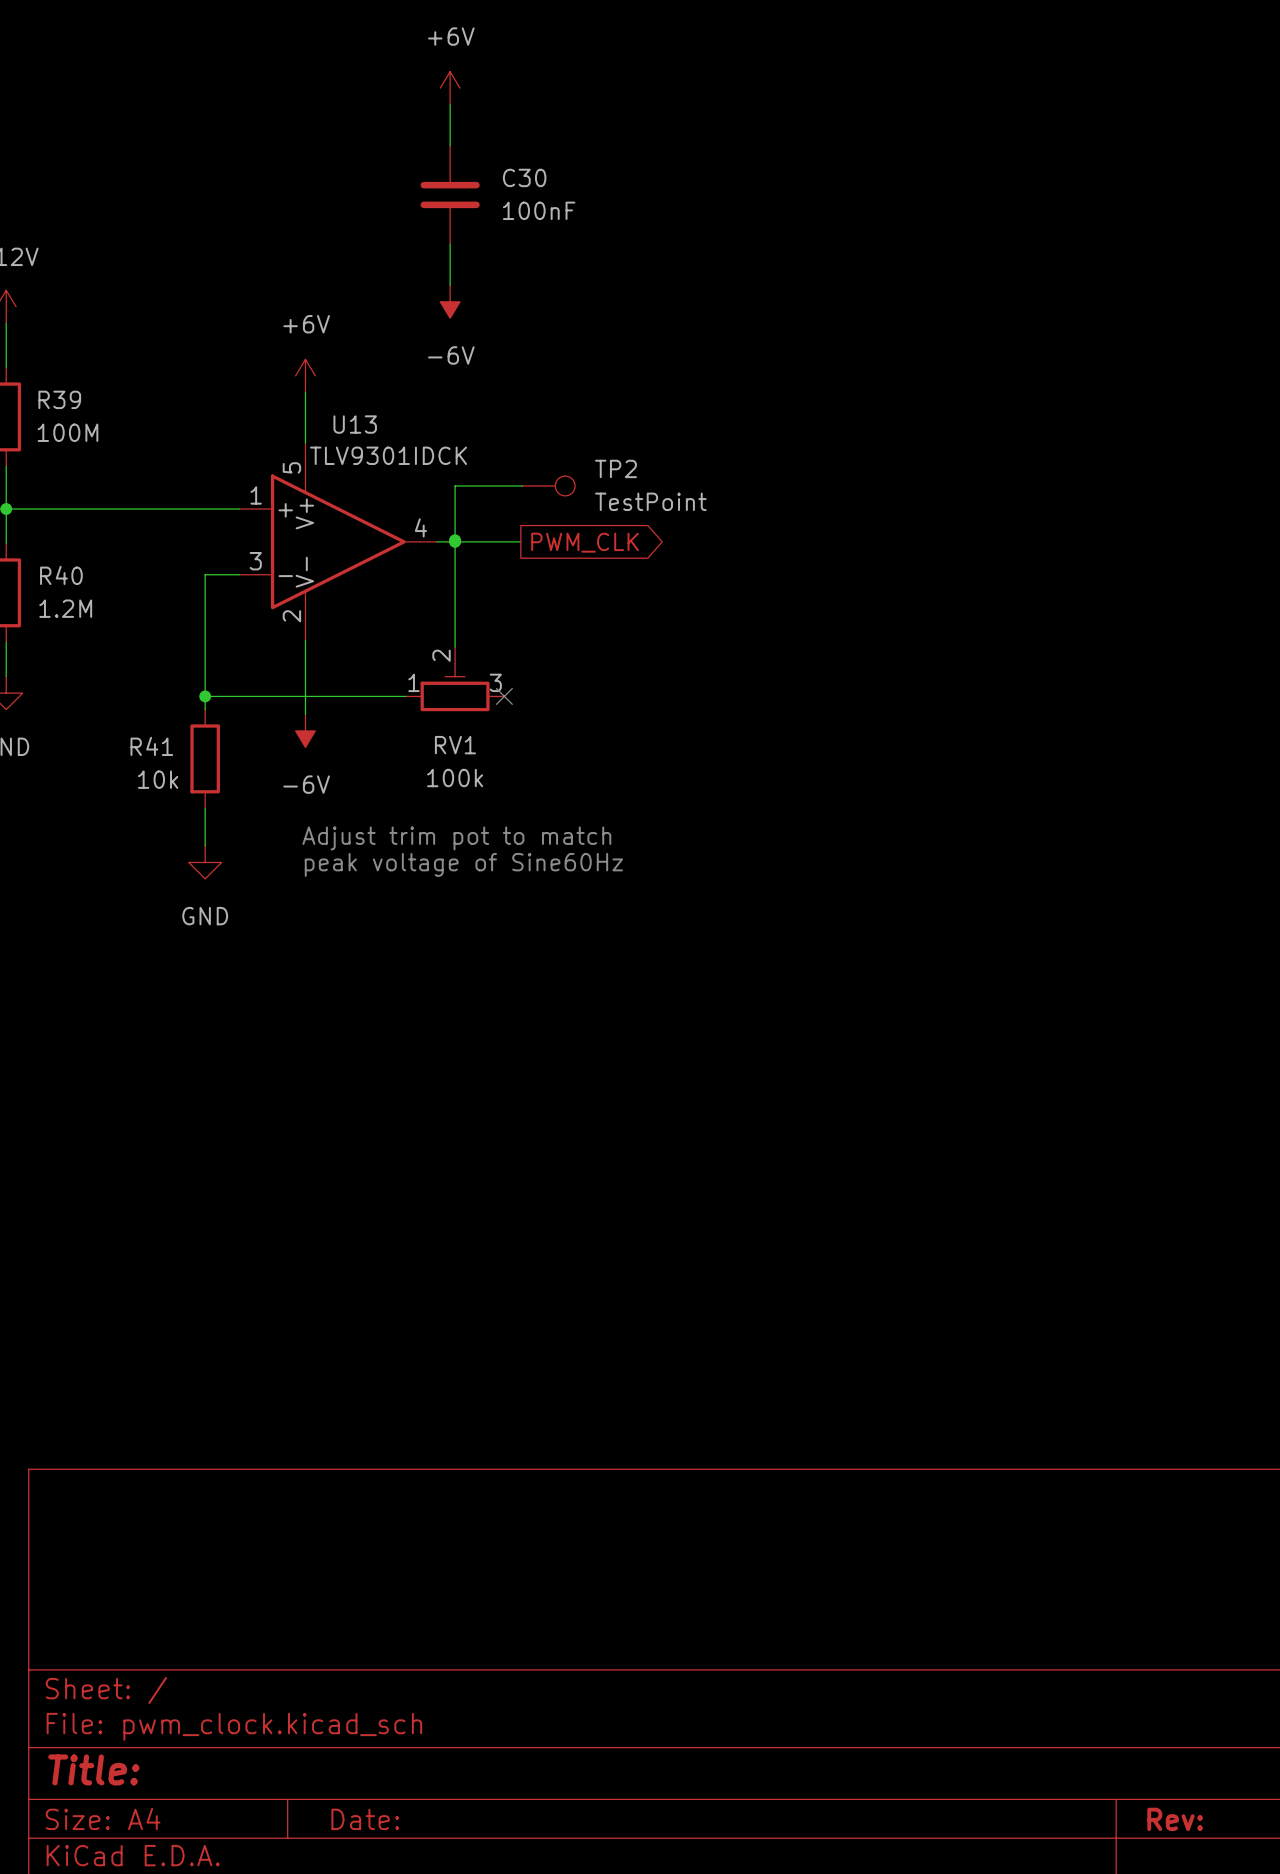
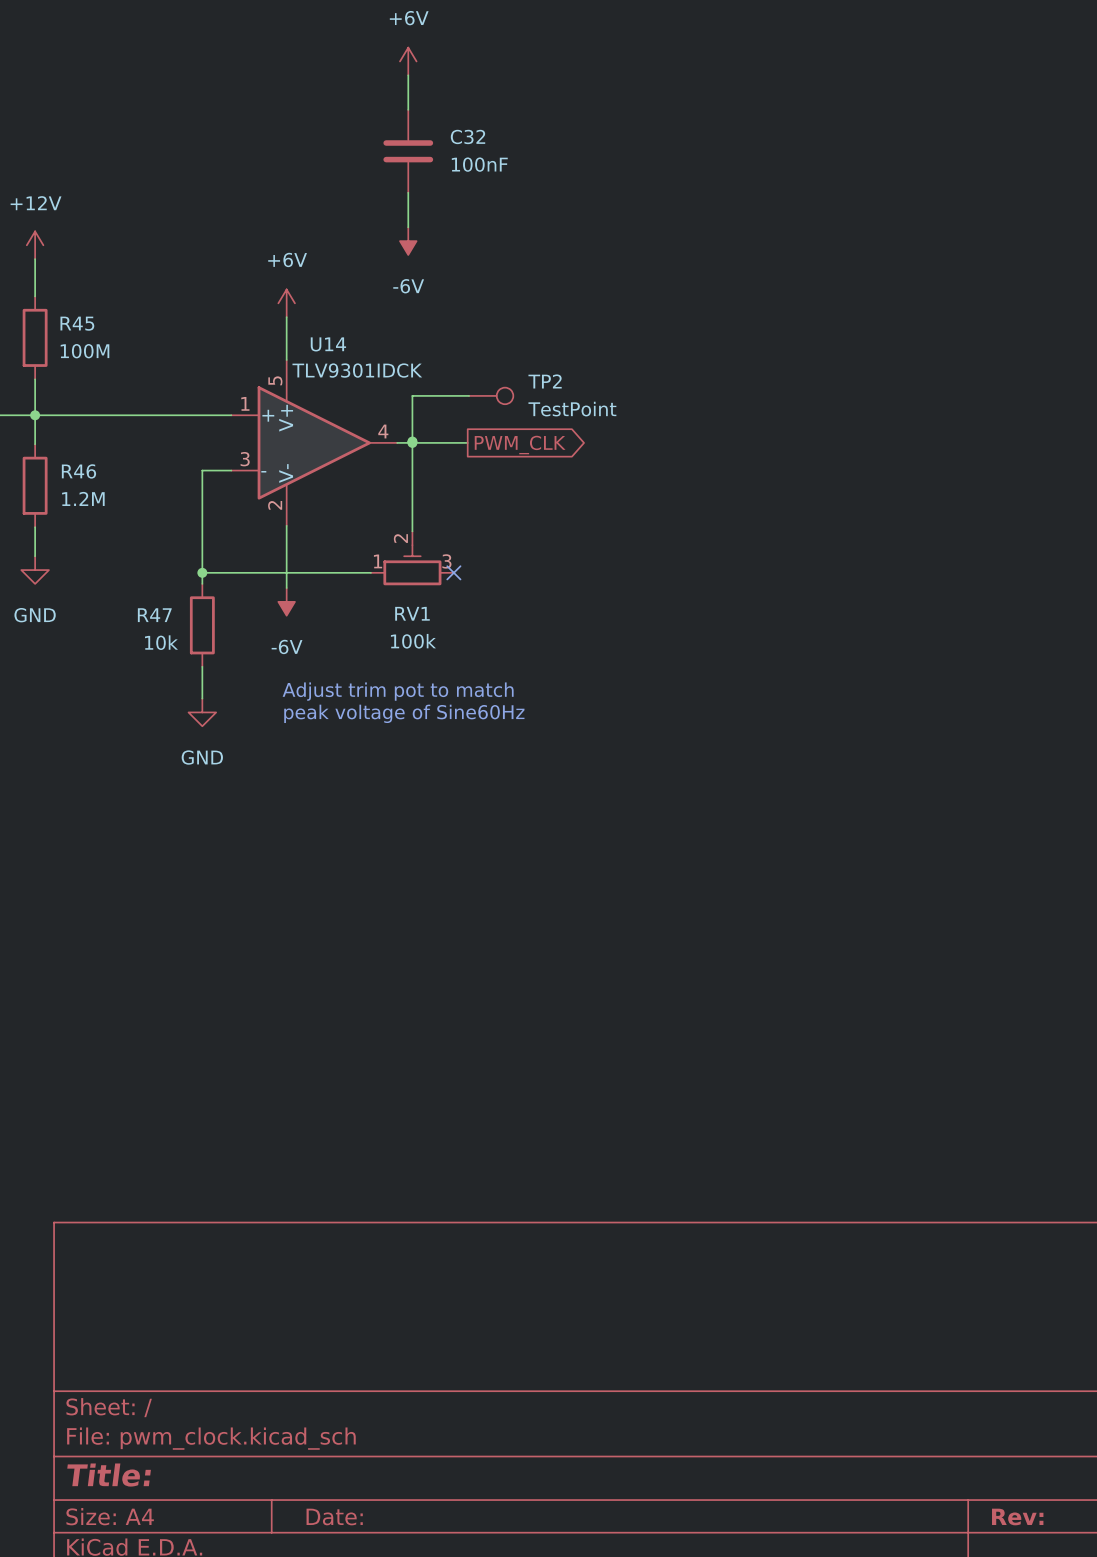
C30 name: C30 (524, 177) -> C32 (468, 136)
R39 name: R39 (59, 399) -> R45 (77, 323)
U13 name: U13 (355, 424) -> U14 (328, 344)
R40 name: R40 (61, 575) -> R46 (78, 471)
R41 name: R41 (151, 746) -> R47 (154, 615)

